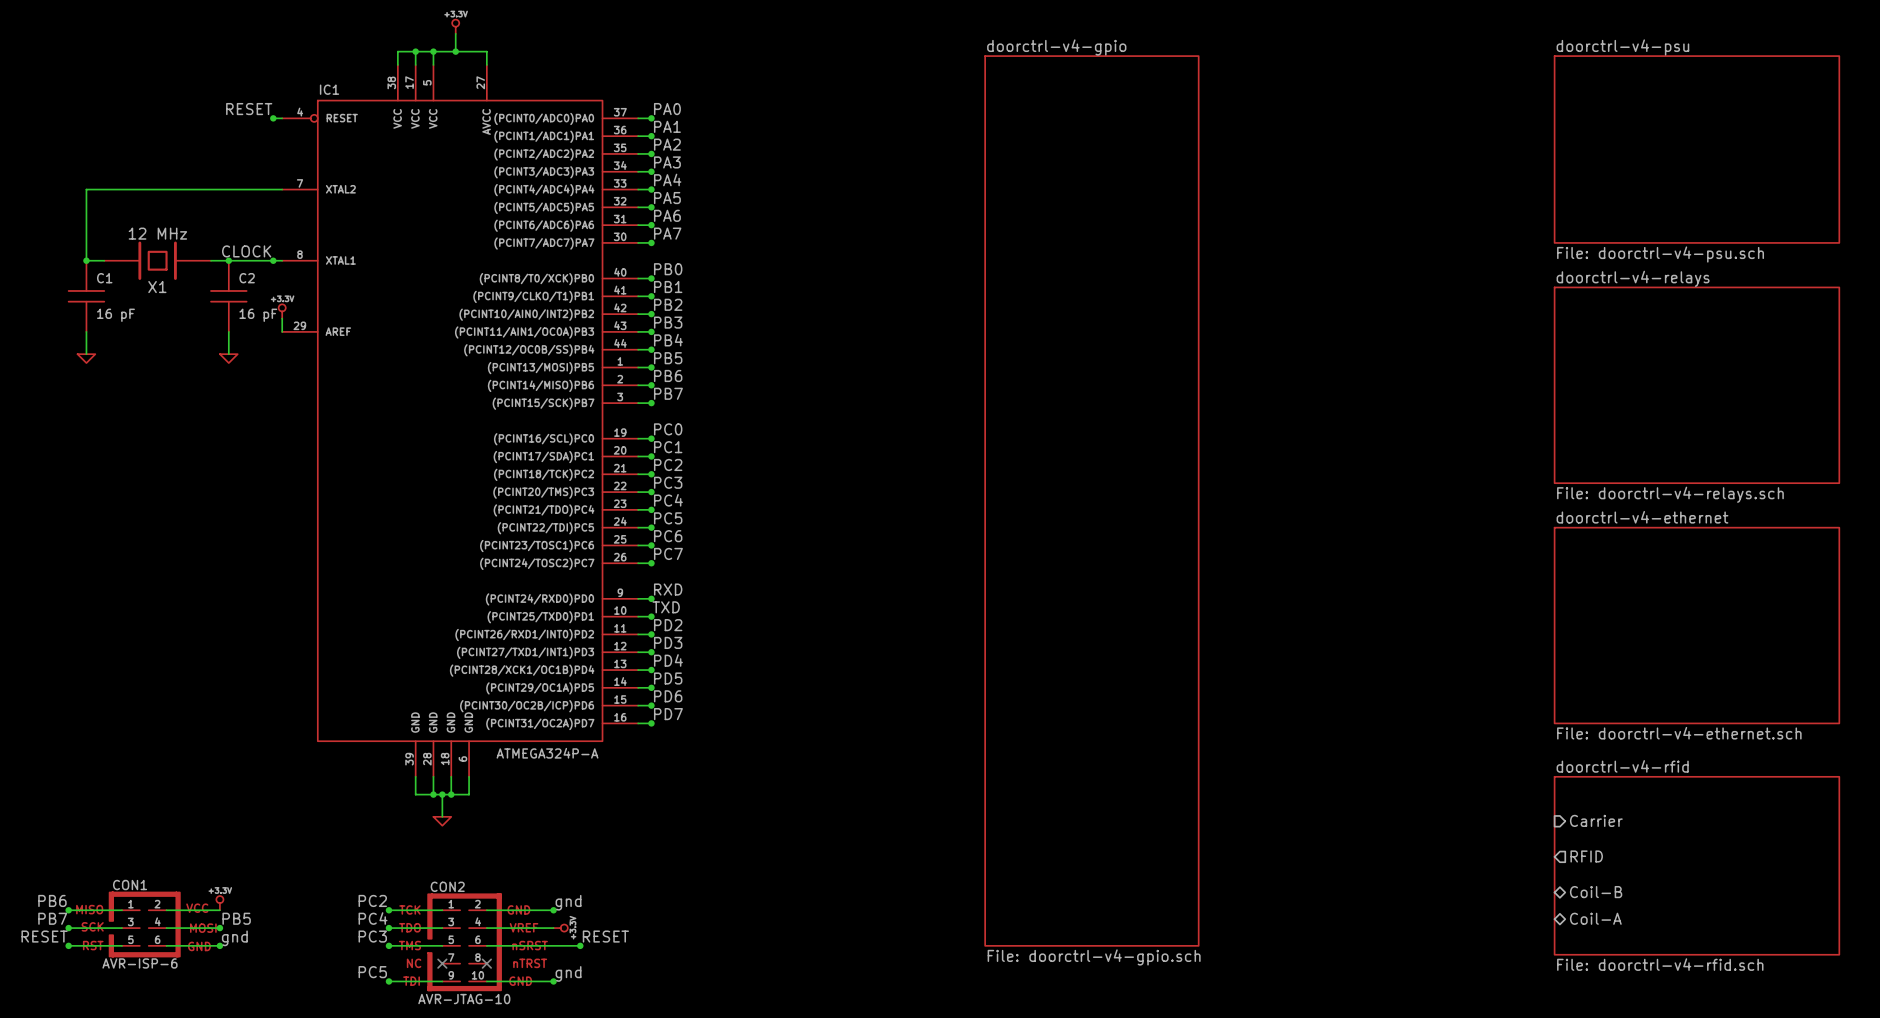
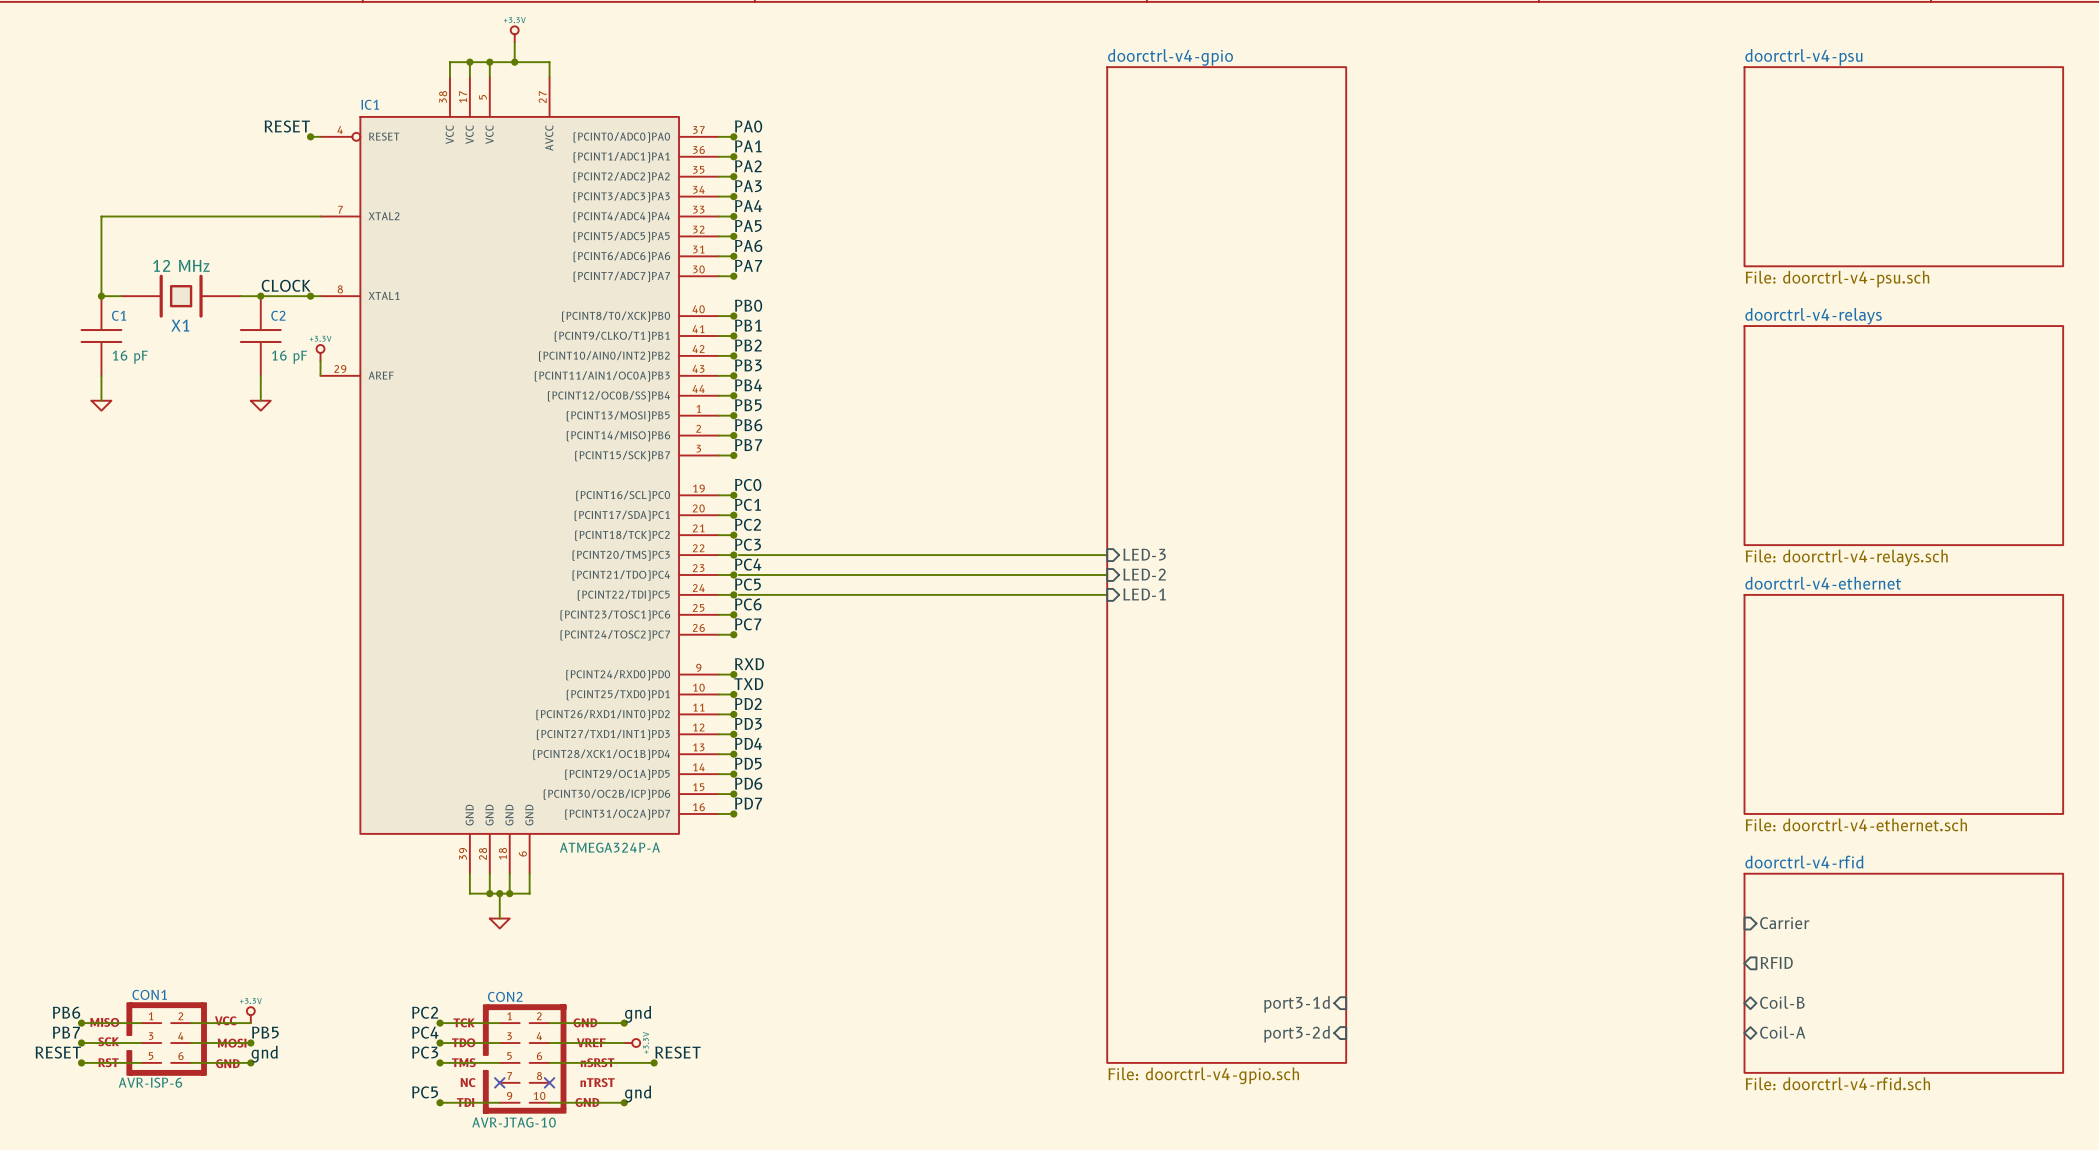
sheet doorctrl-v4-psu shape: [1554, 56, 1840, 243] -> [1744, 67, 2064, 267]
sheet pin: none -> LED-3 (1144, 554)
wire: none -> (738, 555) (1107, 555)
wire: none -> (738, 574) (1107, 574)
sheet pin: none -> LED-2 (1144, 574)
wire: none -> (738, 594) (1107, 594)
sheet pin: none -> LED-1 (1144, 594)
sheet pin: none -> port3-1d (1297, 1004)
sheet pin: none -> port3-2d (1297, 1034)

